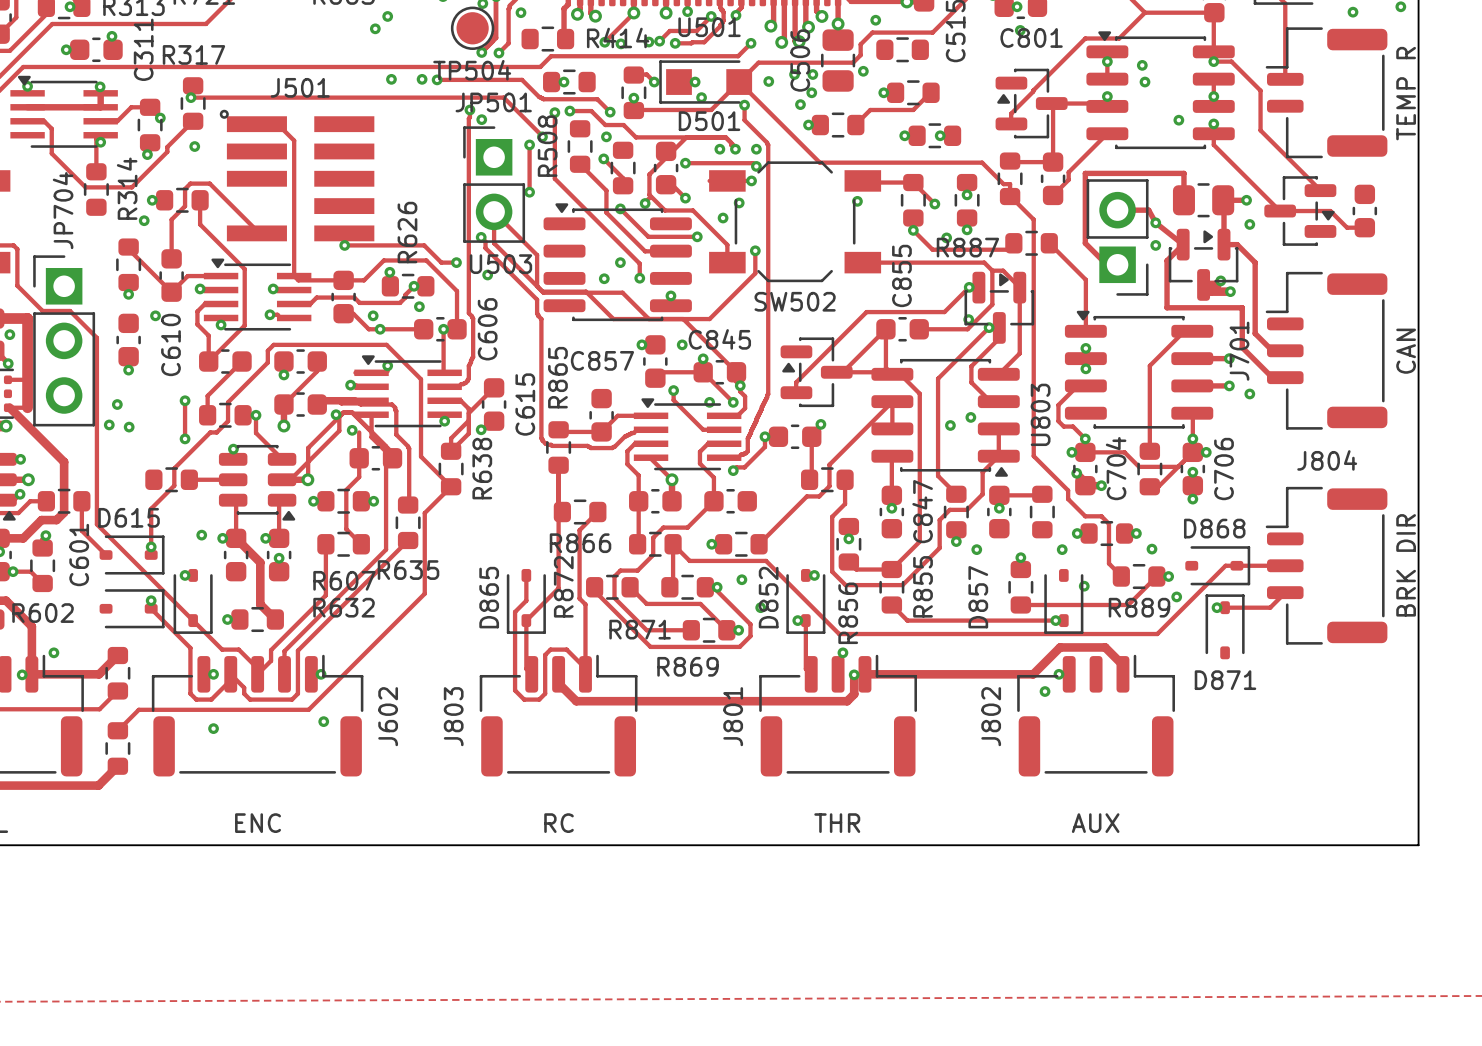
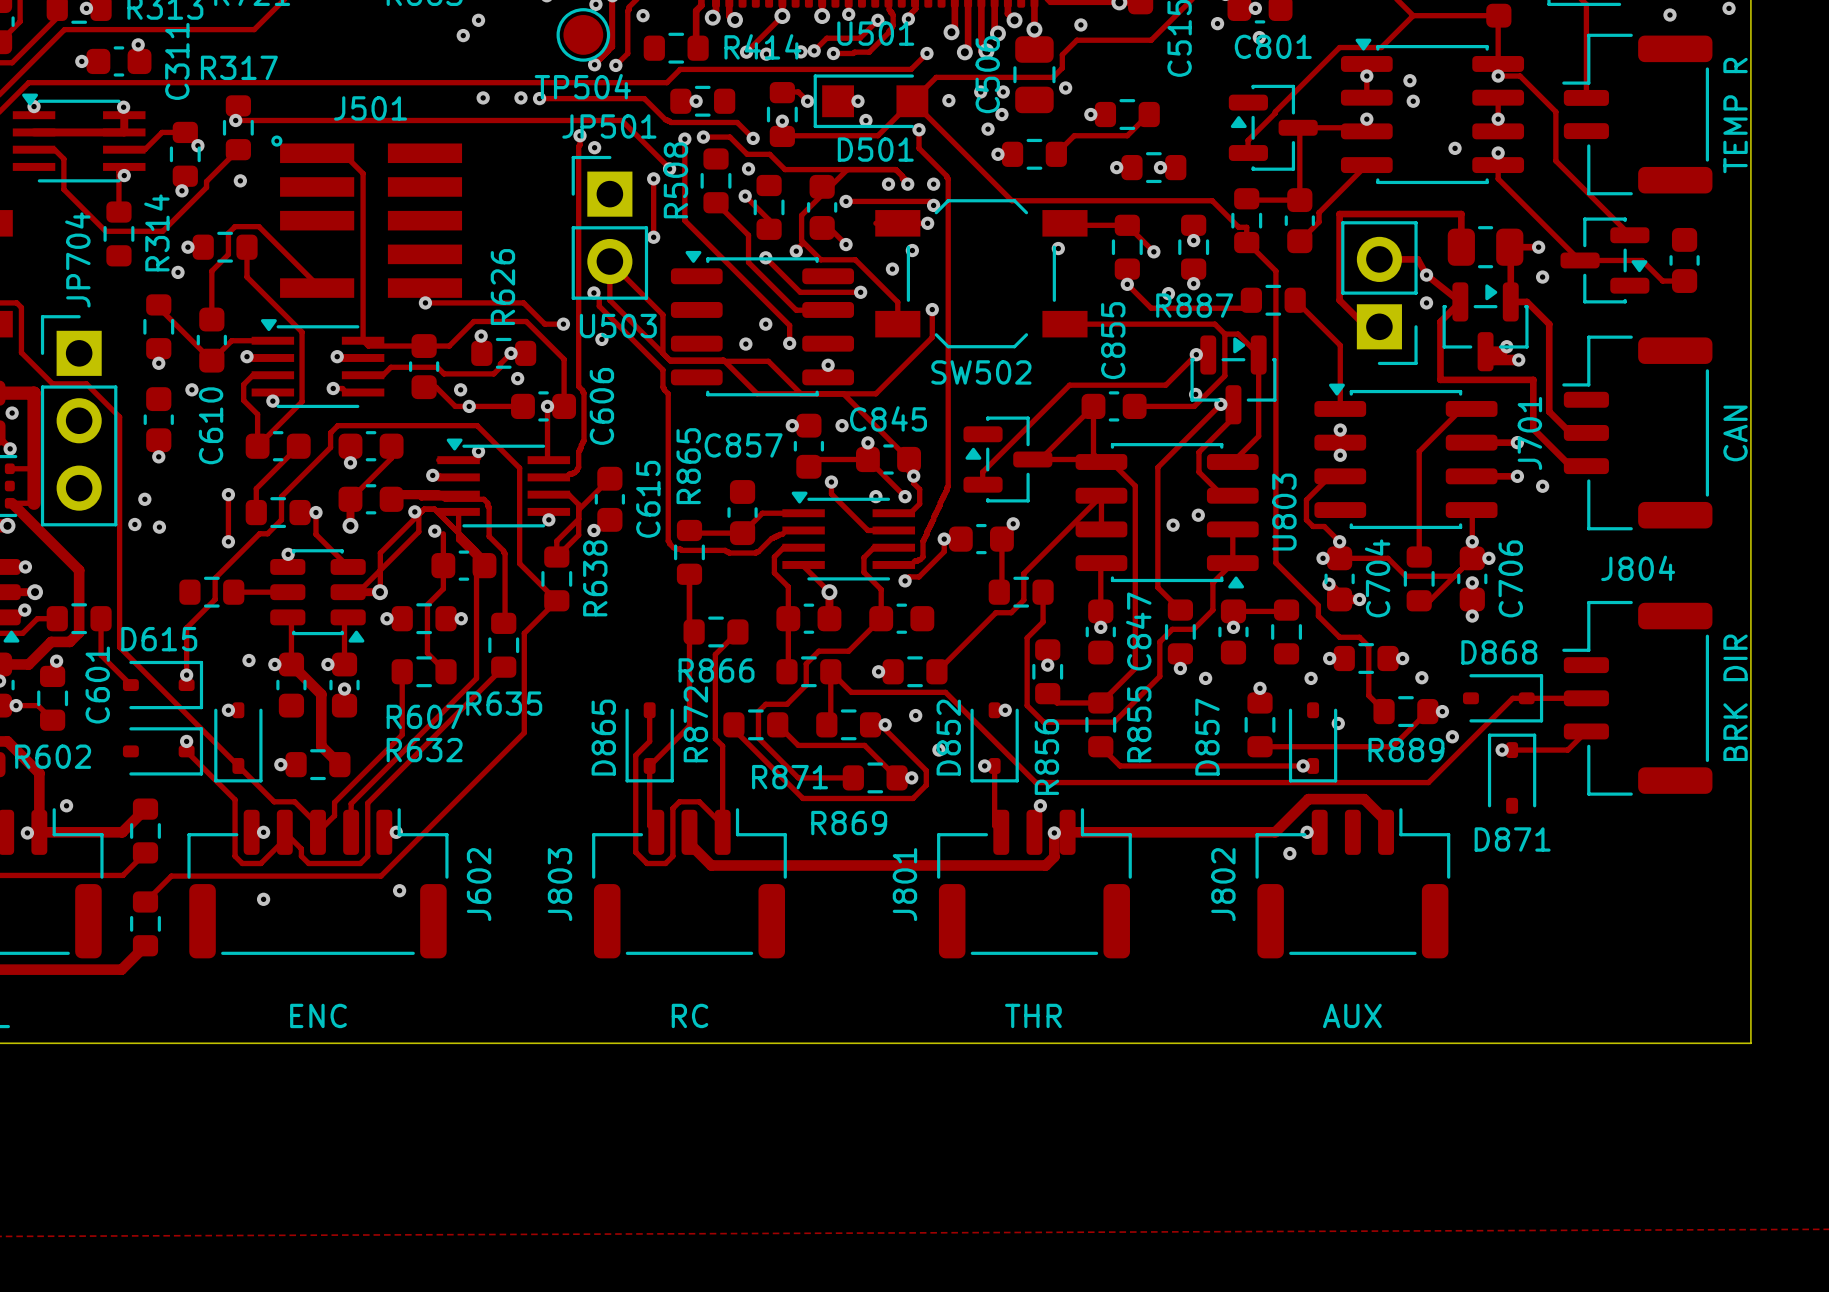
via: none -> (1217, 23)
part: (902, 49) -> none

